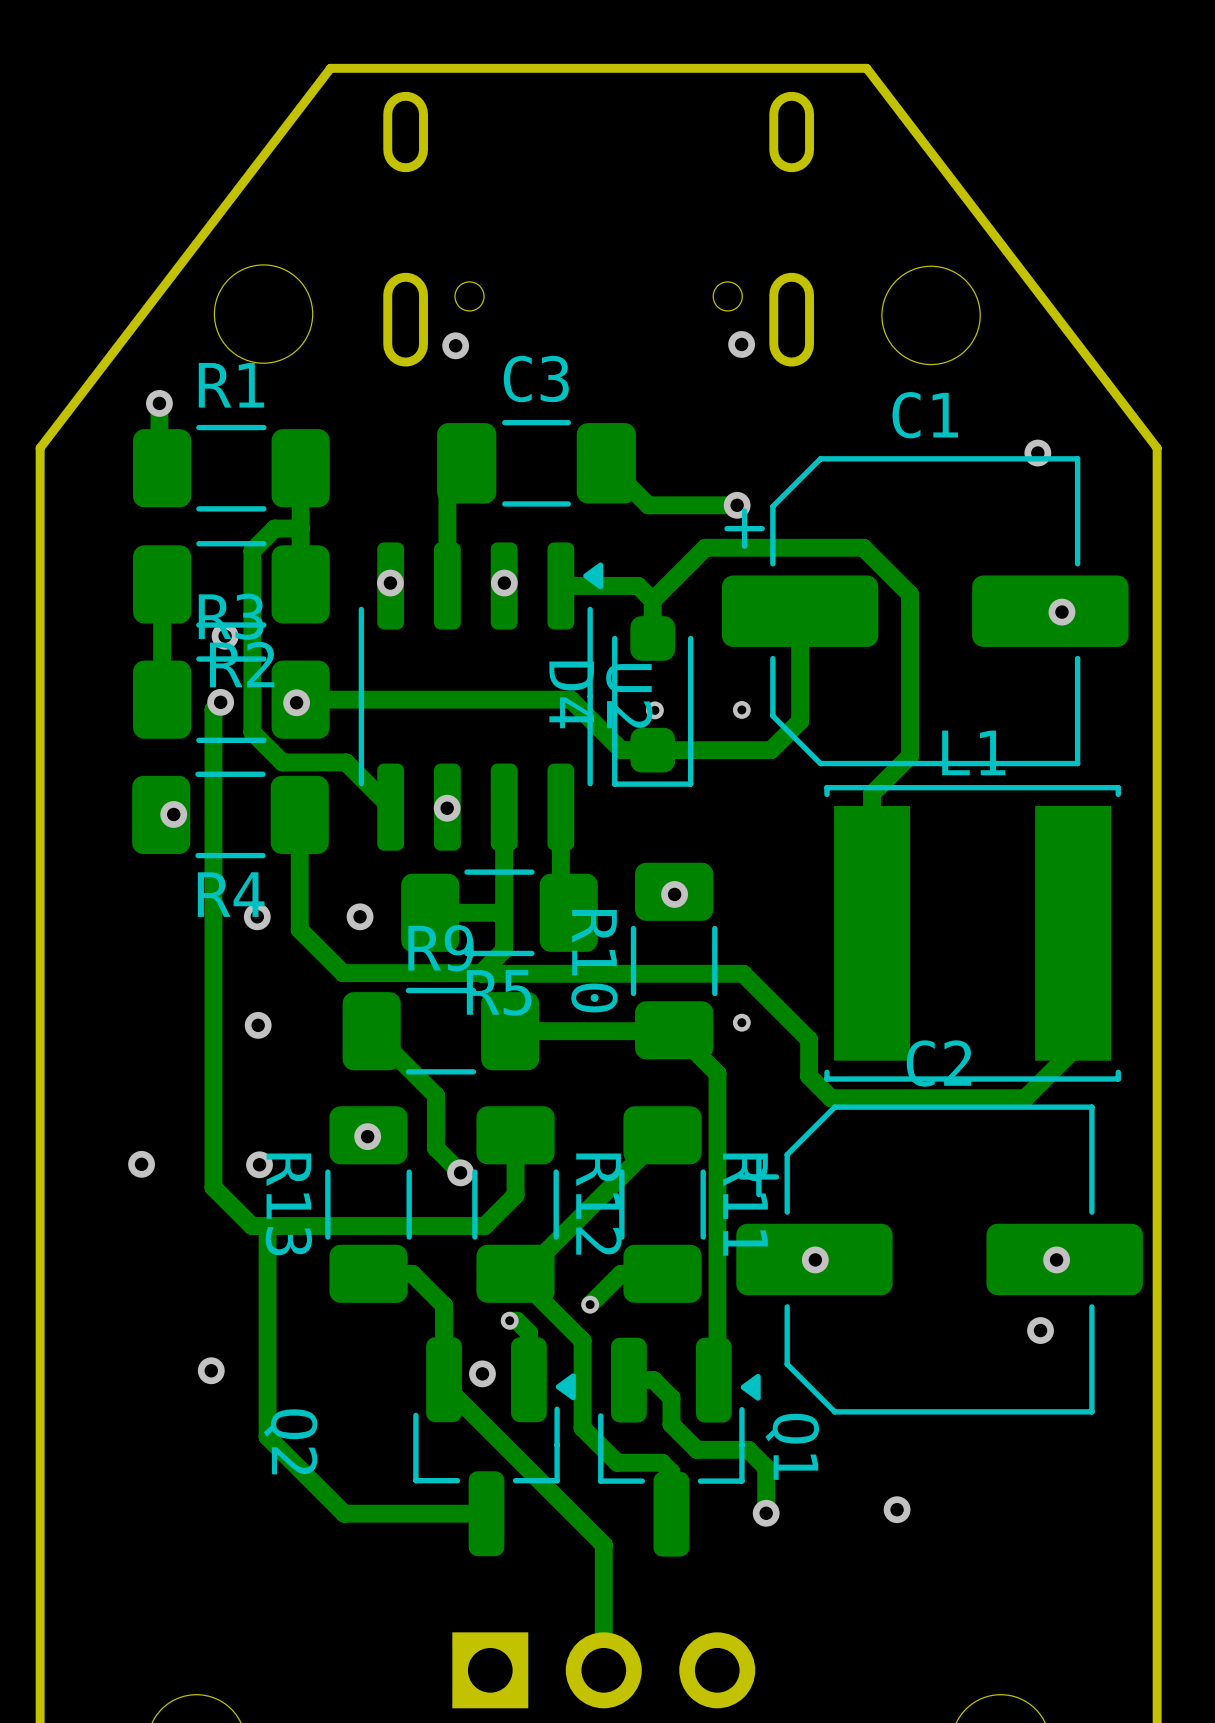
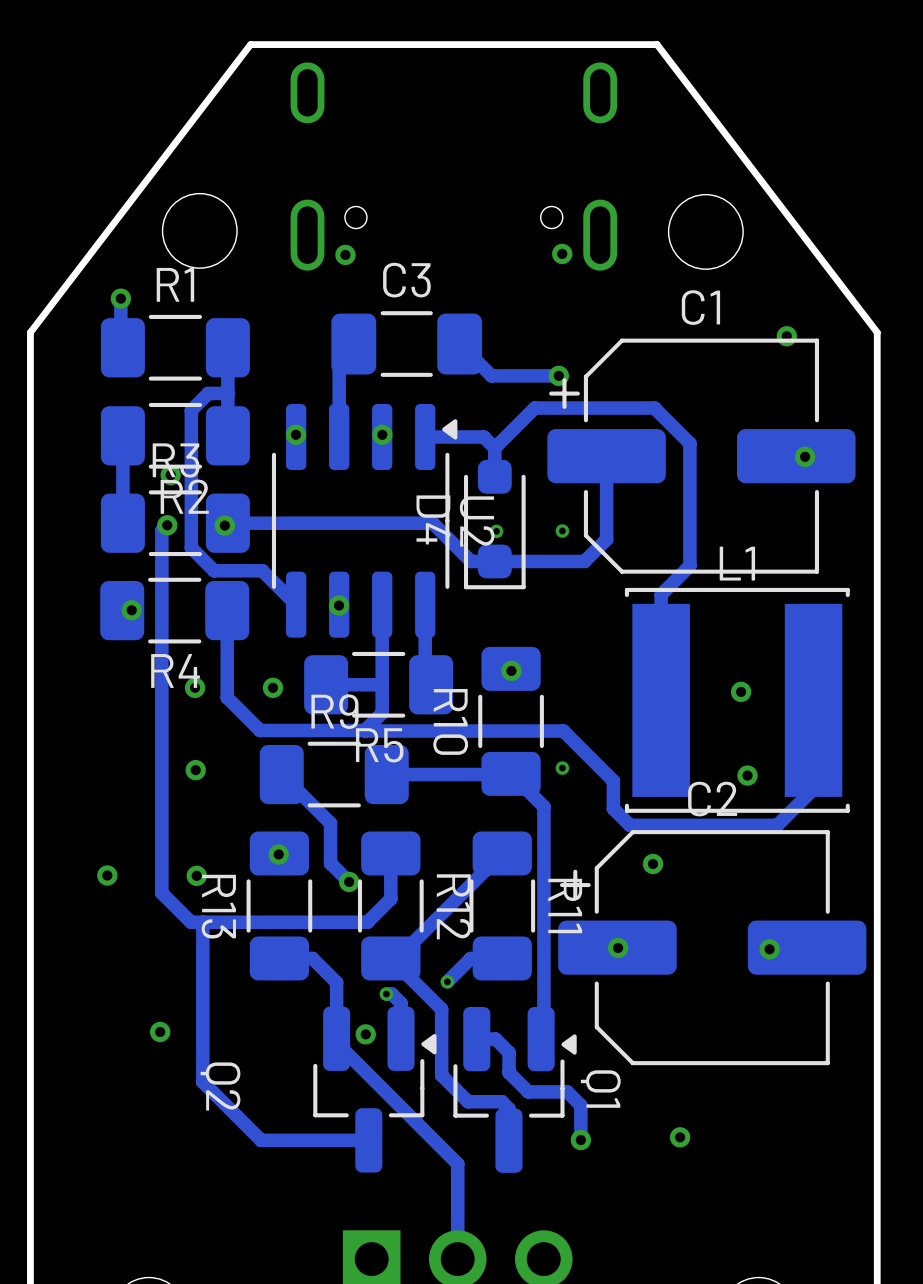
via: none -> (741, 691)
via: none -> (747, 775)
via: none -> (653, 863)
via: (1056, 1259) -> none
via: none -> (769, 949)
via: (1040, 1330) -> none

